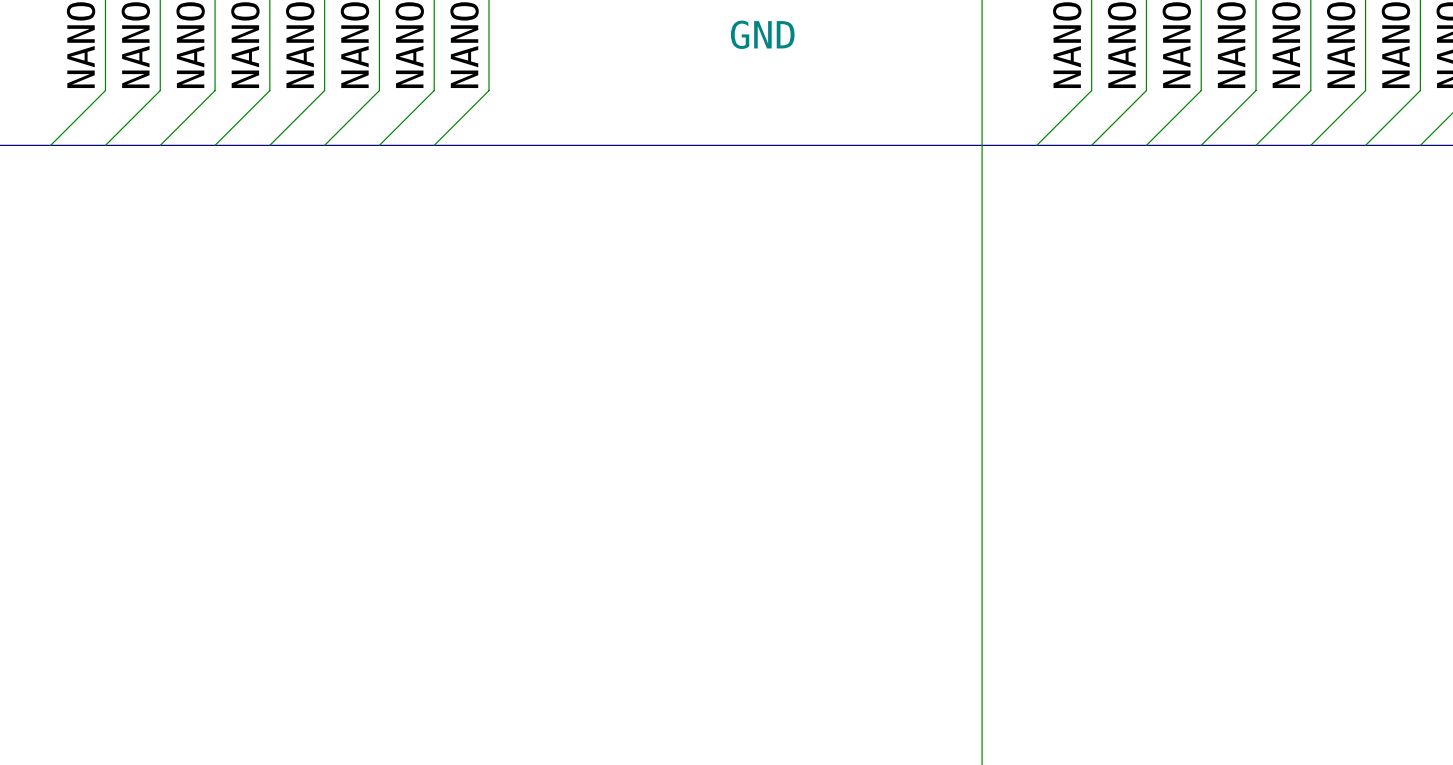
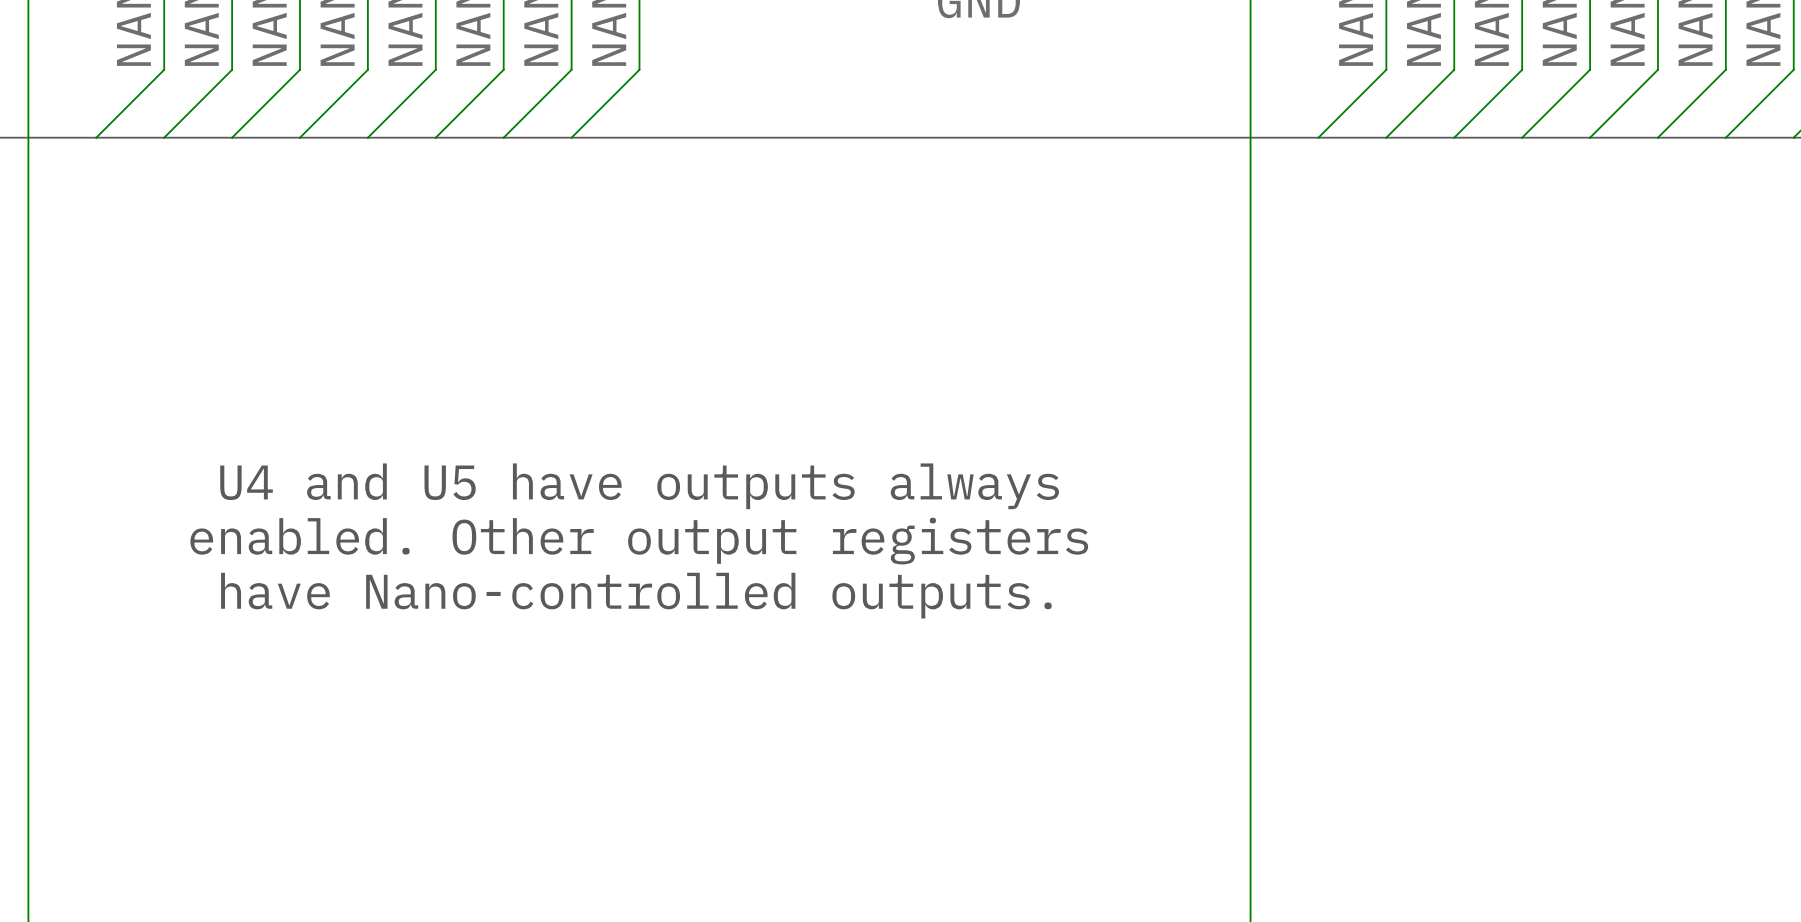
text: none -> U4 and U5 have outputs always (639, 486)
text: none -> enabled. Other output registers (639, 541)
text: none -> have Nano-controlled outputs. (636, 595)

